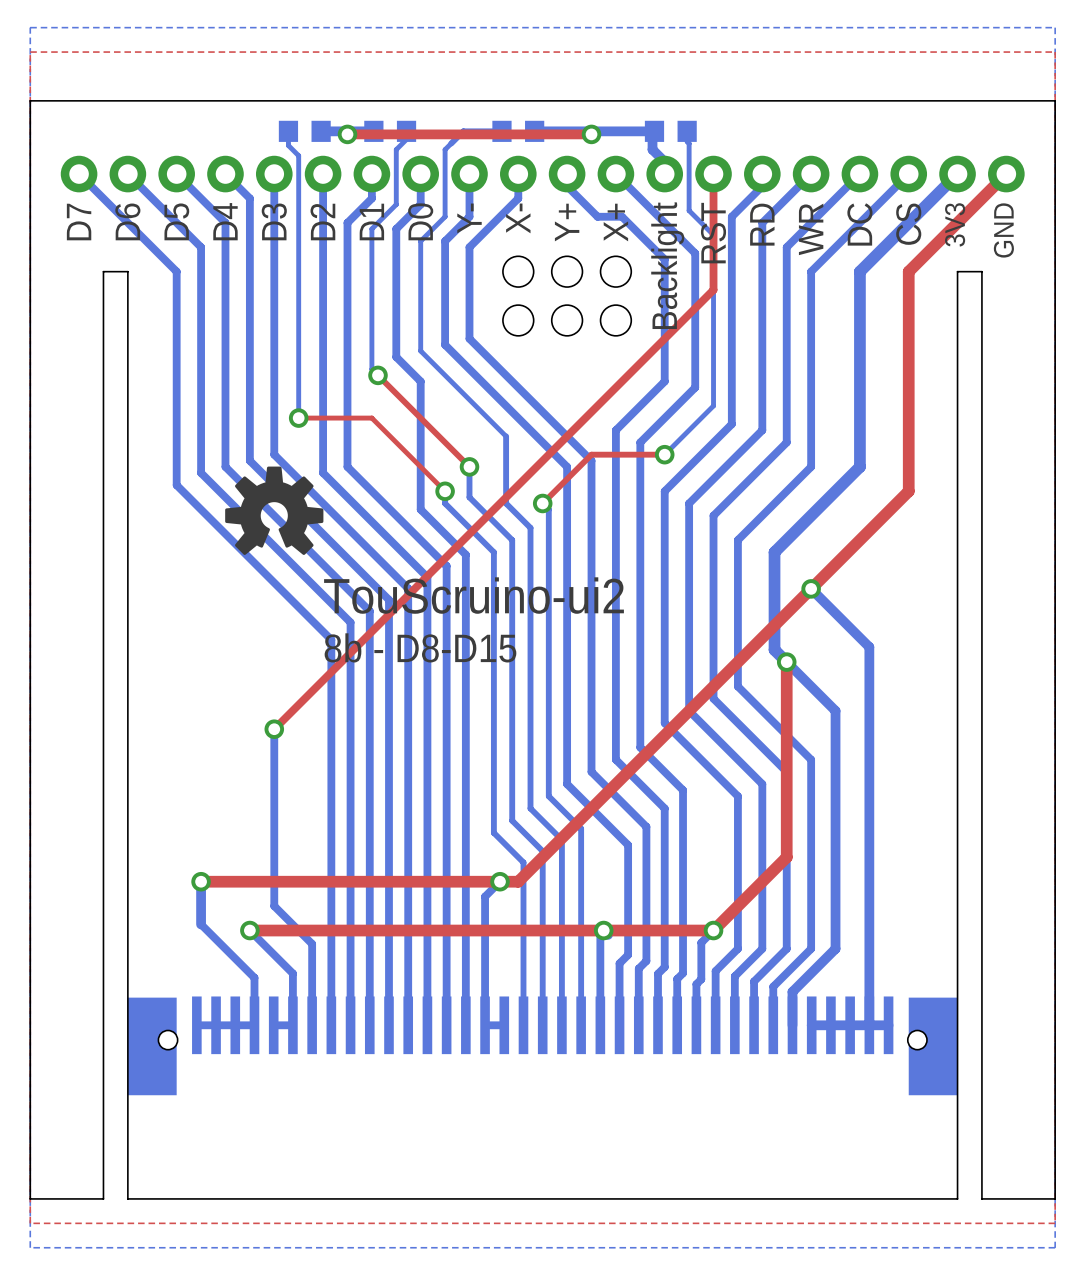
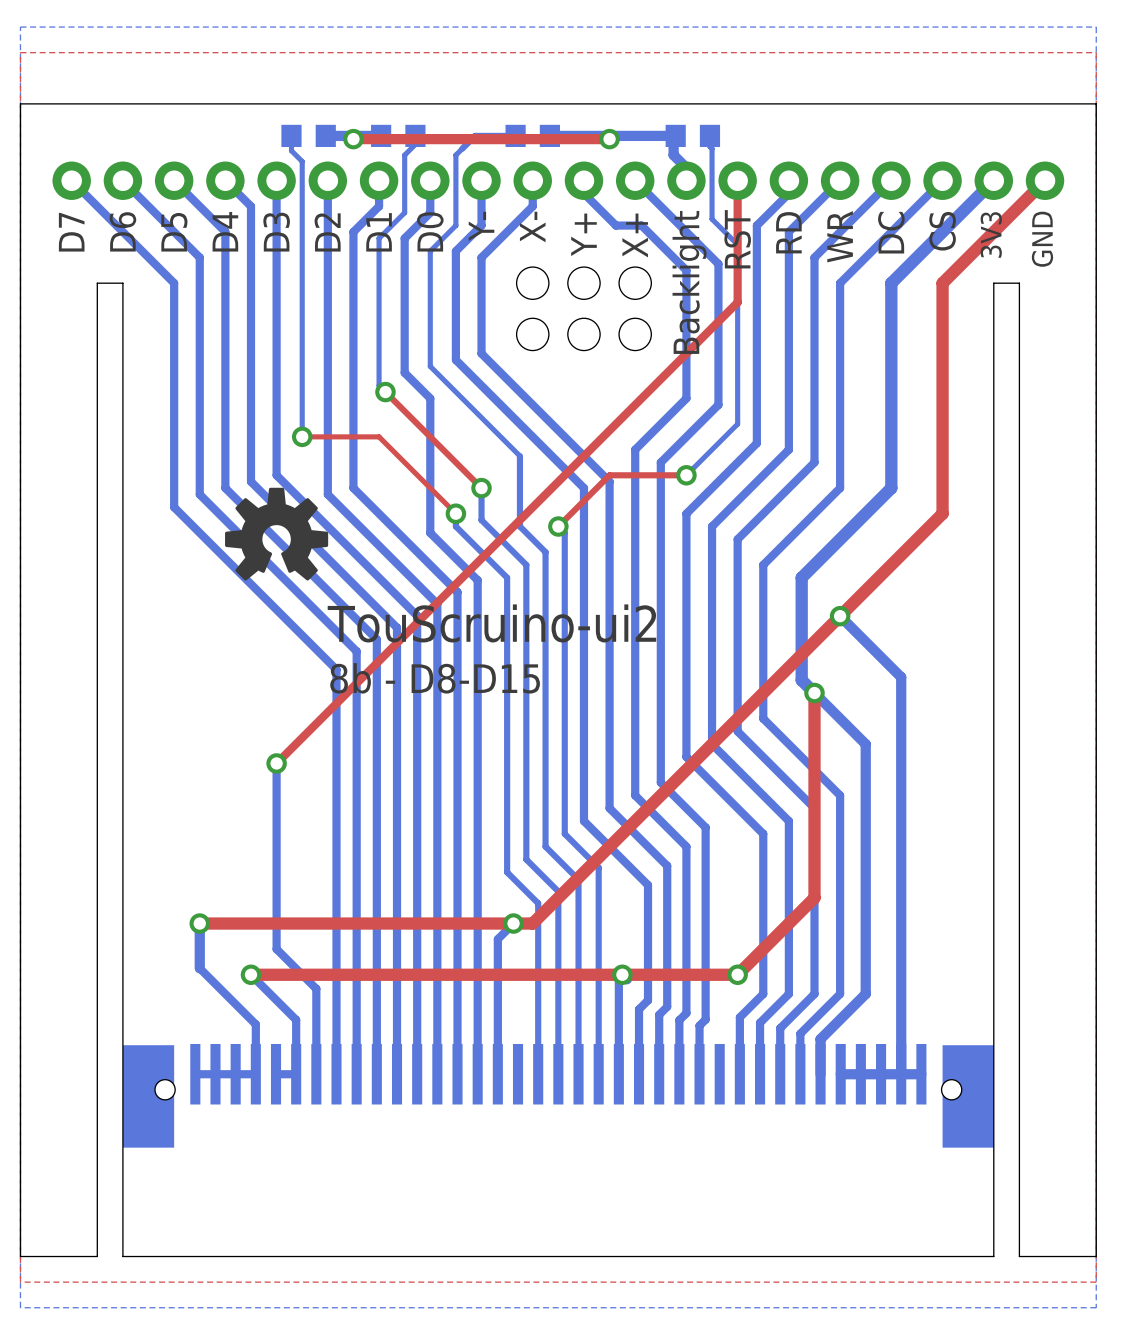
bottom track: (713, 930) (701, 942) (701, 979) (696, 984) (696, 1025) -> none
bottom track: (485, 1025) (504, 1025) -> none

